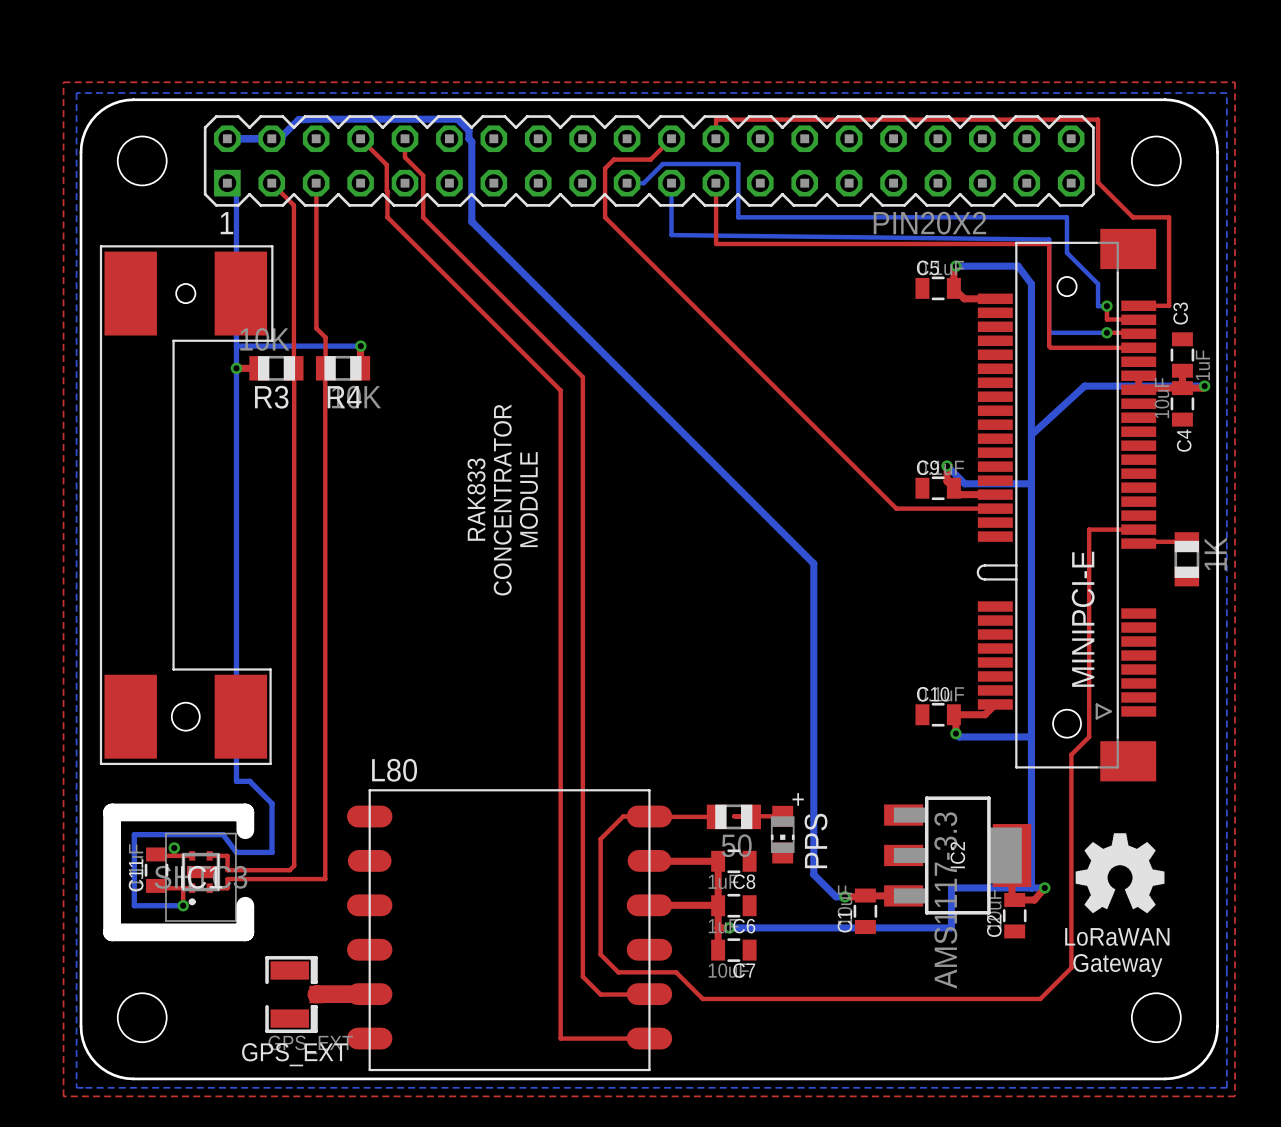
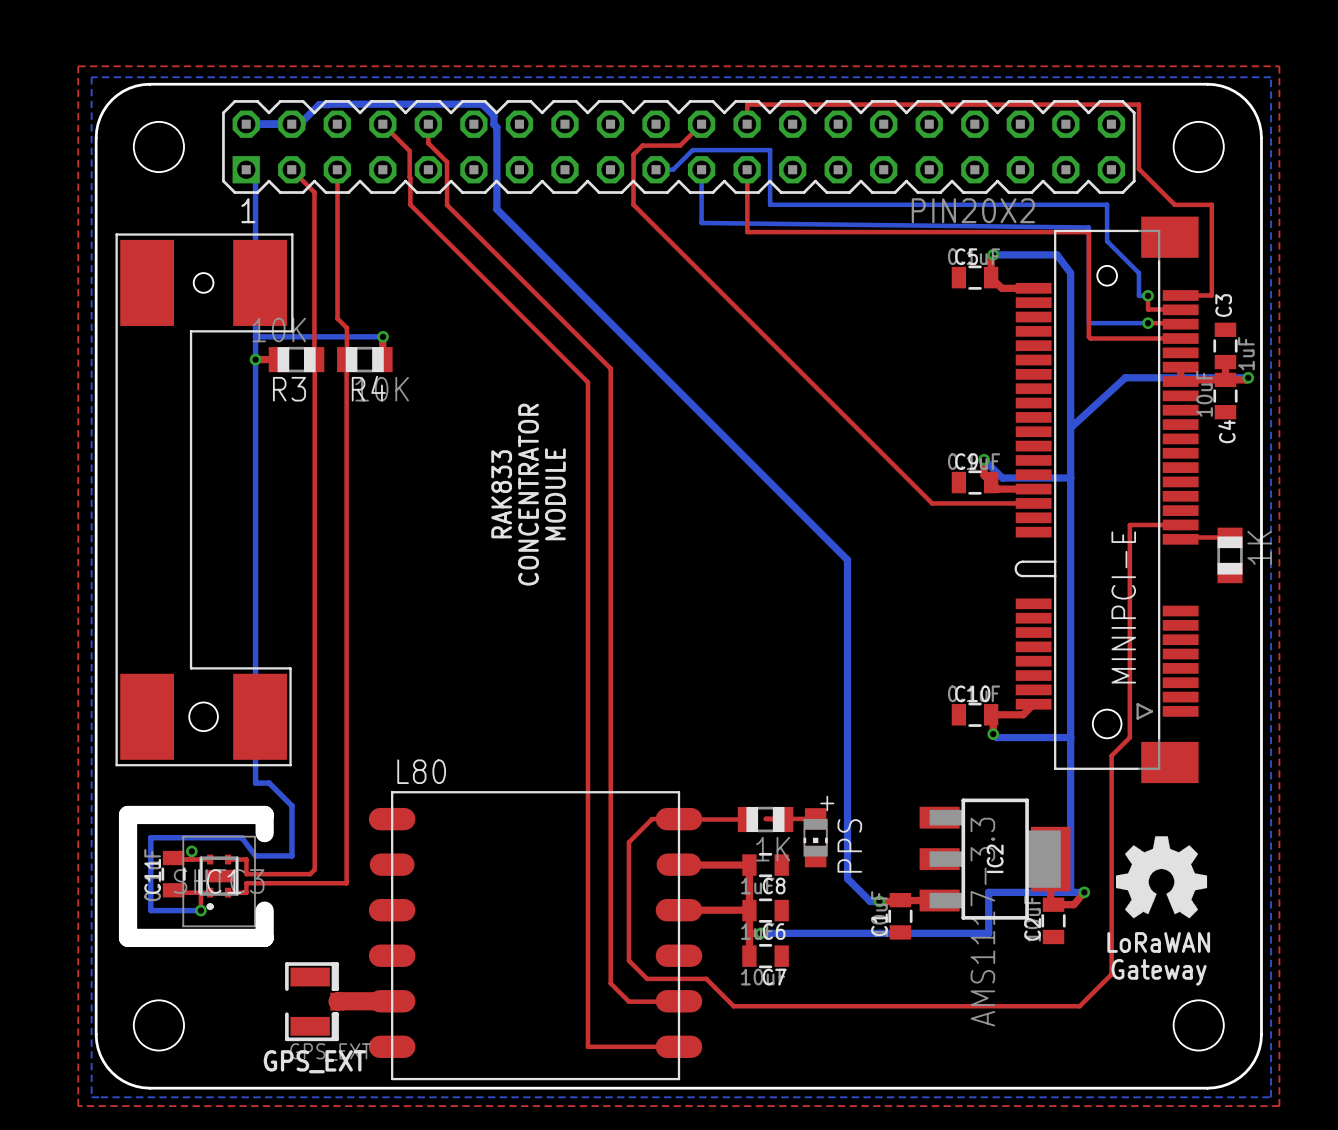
part value: 50 (736, 845) -> 1K (773, 849)

